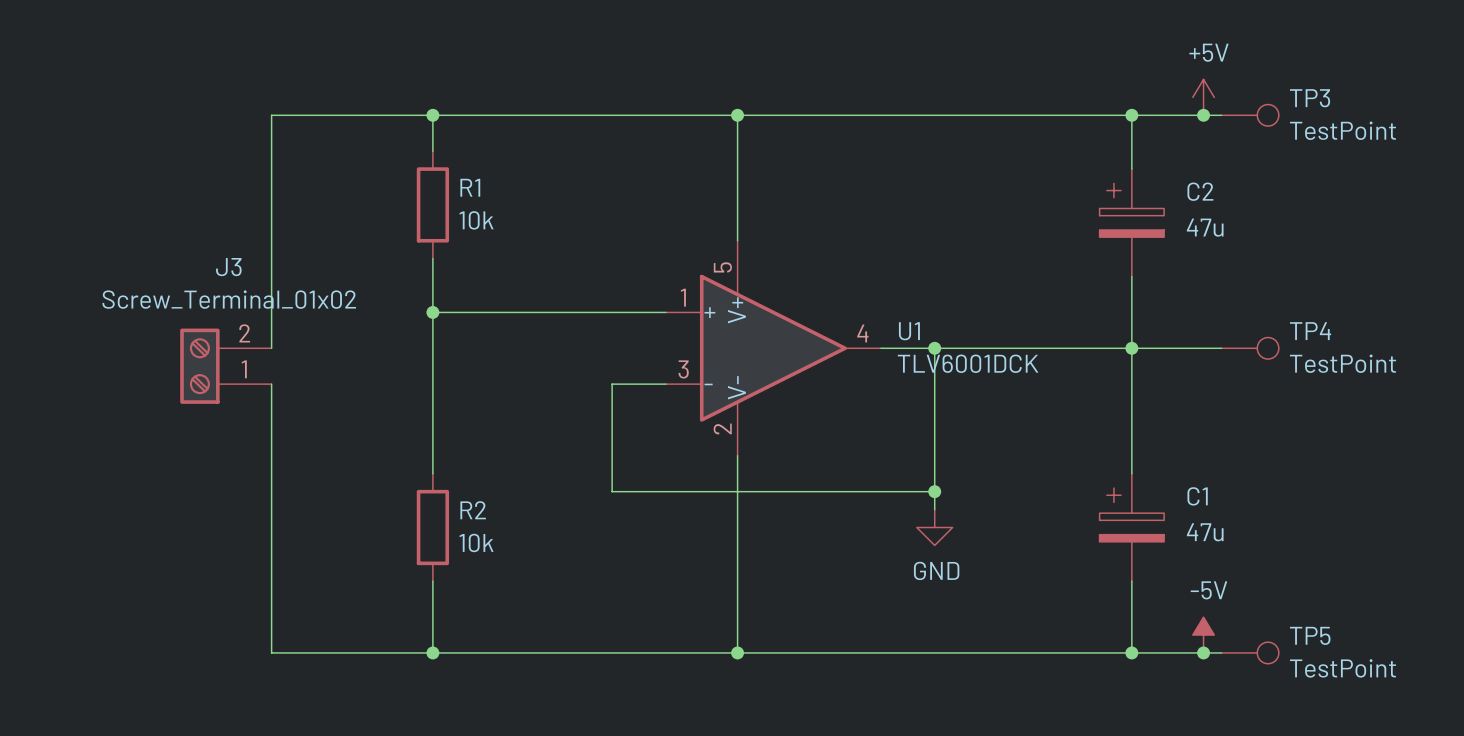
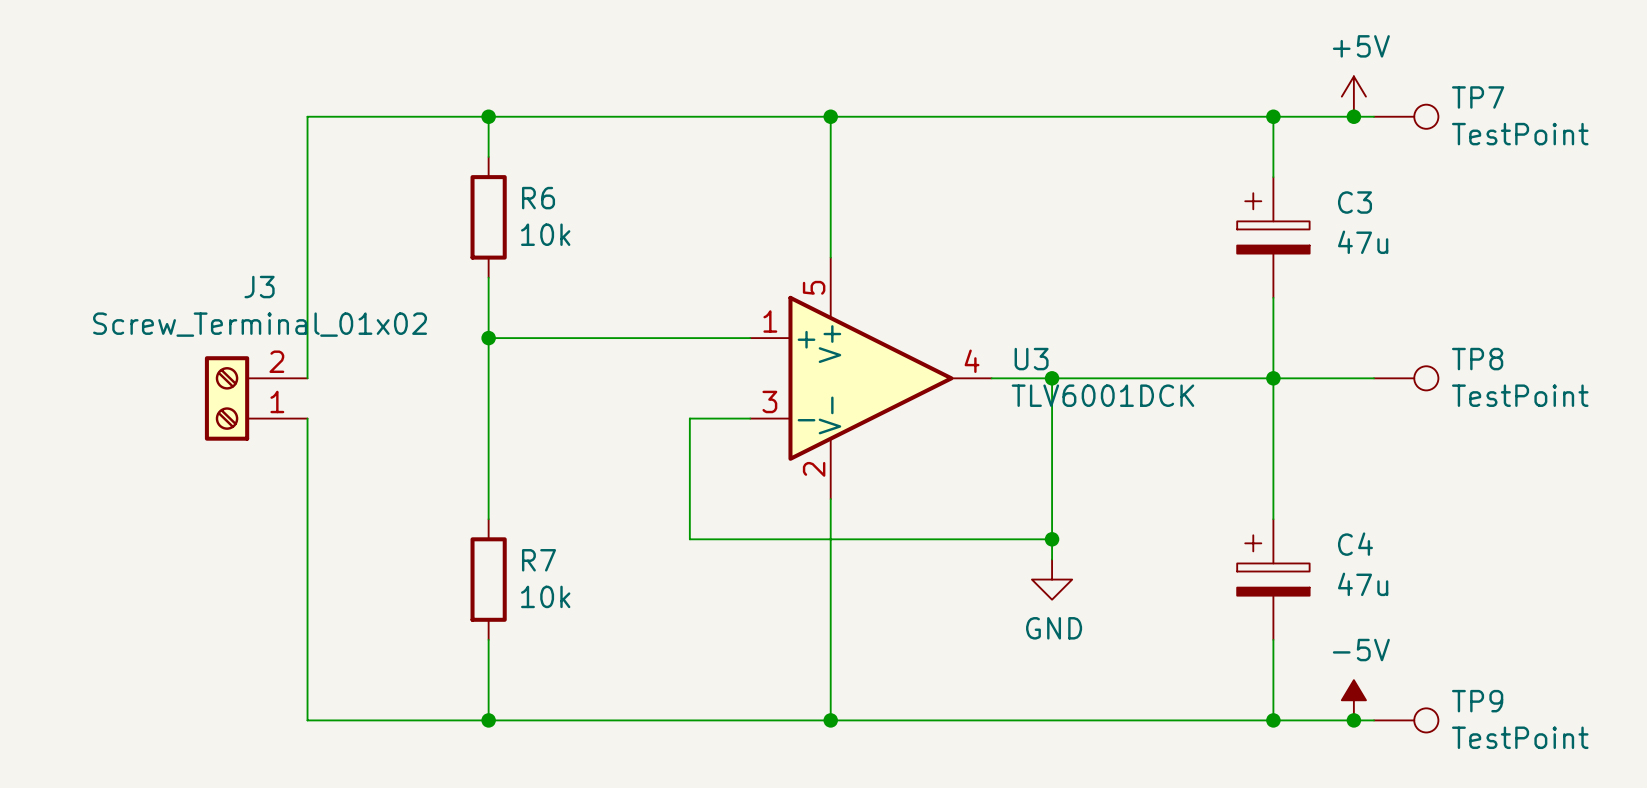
TP3 name: TP3 (1310, 98) -> TP7 (1478, 97)
R1 name: R1 (470, 187) -> R6 (538, 198)
C2 name: C2 (1200, 191) -> C3 (1355, 202)
U1 name: U1 (909, 331) -> U3 (1031, 359)
TP4 name: TP4 (1310, 331) -> TP8 (1477, 359)
C1 name: C1 (1197, 496) -> C4 (1355, 544)
R2 name: R2 (473, 510) -> R7 (538, 560)
TP5 name: TP5 (1310, 635) -> TP9 (1477, 701)

